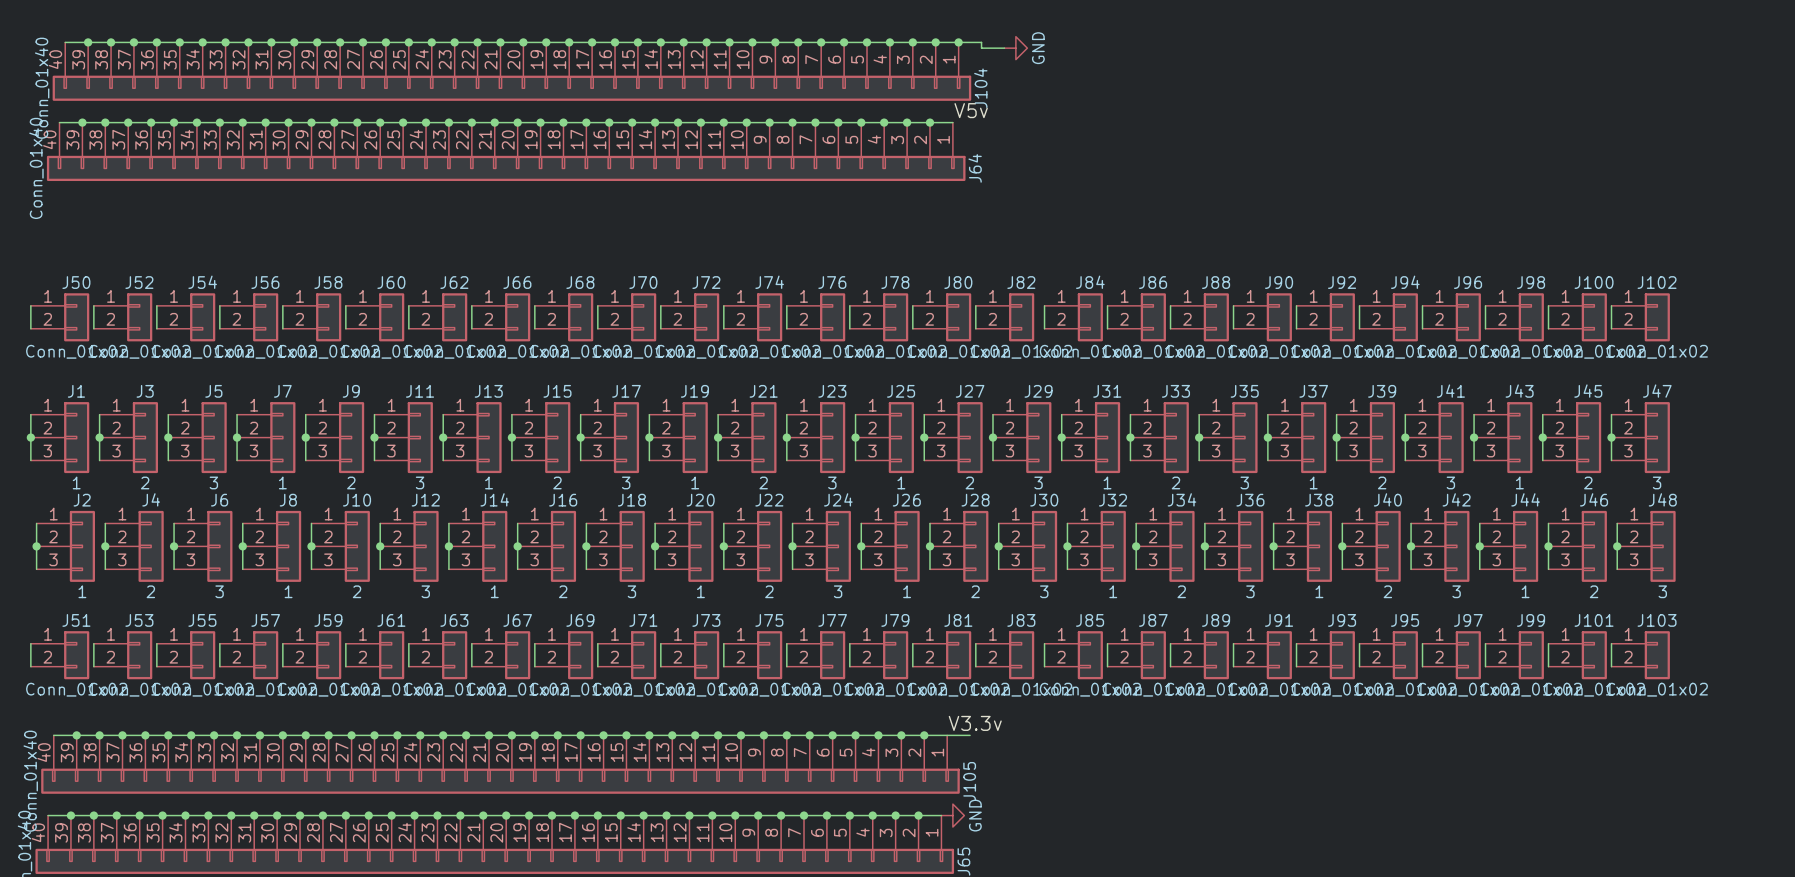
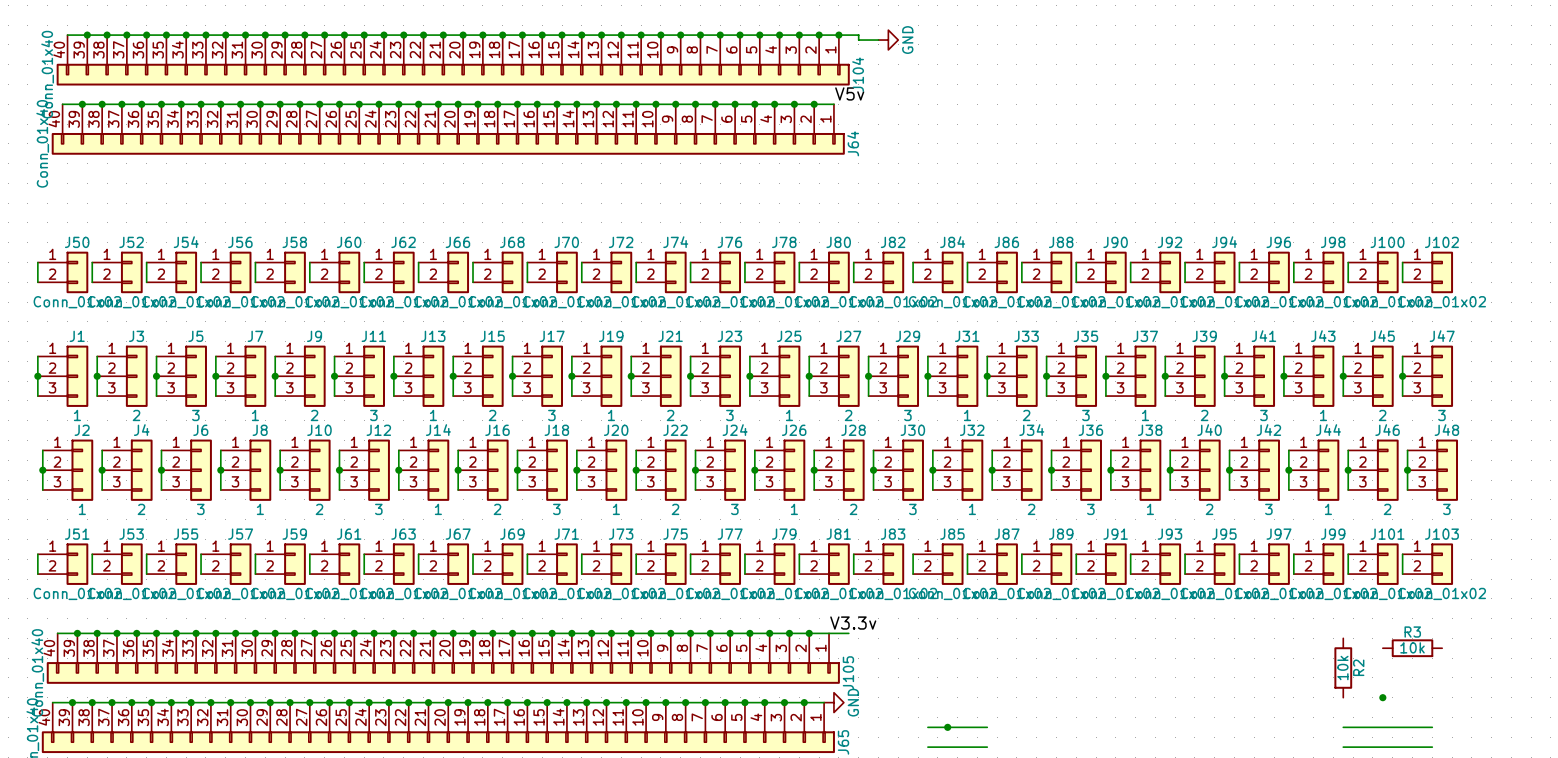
R3: none -> 10k (1412, 648)
R2: none -> 10k (1343, 668)
junction: none -> (1382, 697)
wire: none -> (927, 727) (987, 727)
junction: none -> (947, 727)
wire: none -> (1343, 727) (1432, 727)
wire: none -> (927, 747) (987, 747)
wire: none -> (1343, 747) (1432, 747)

